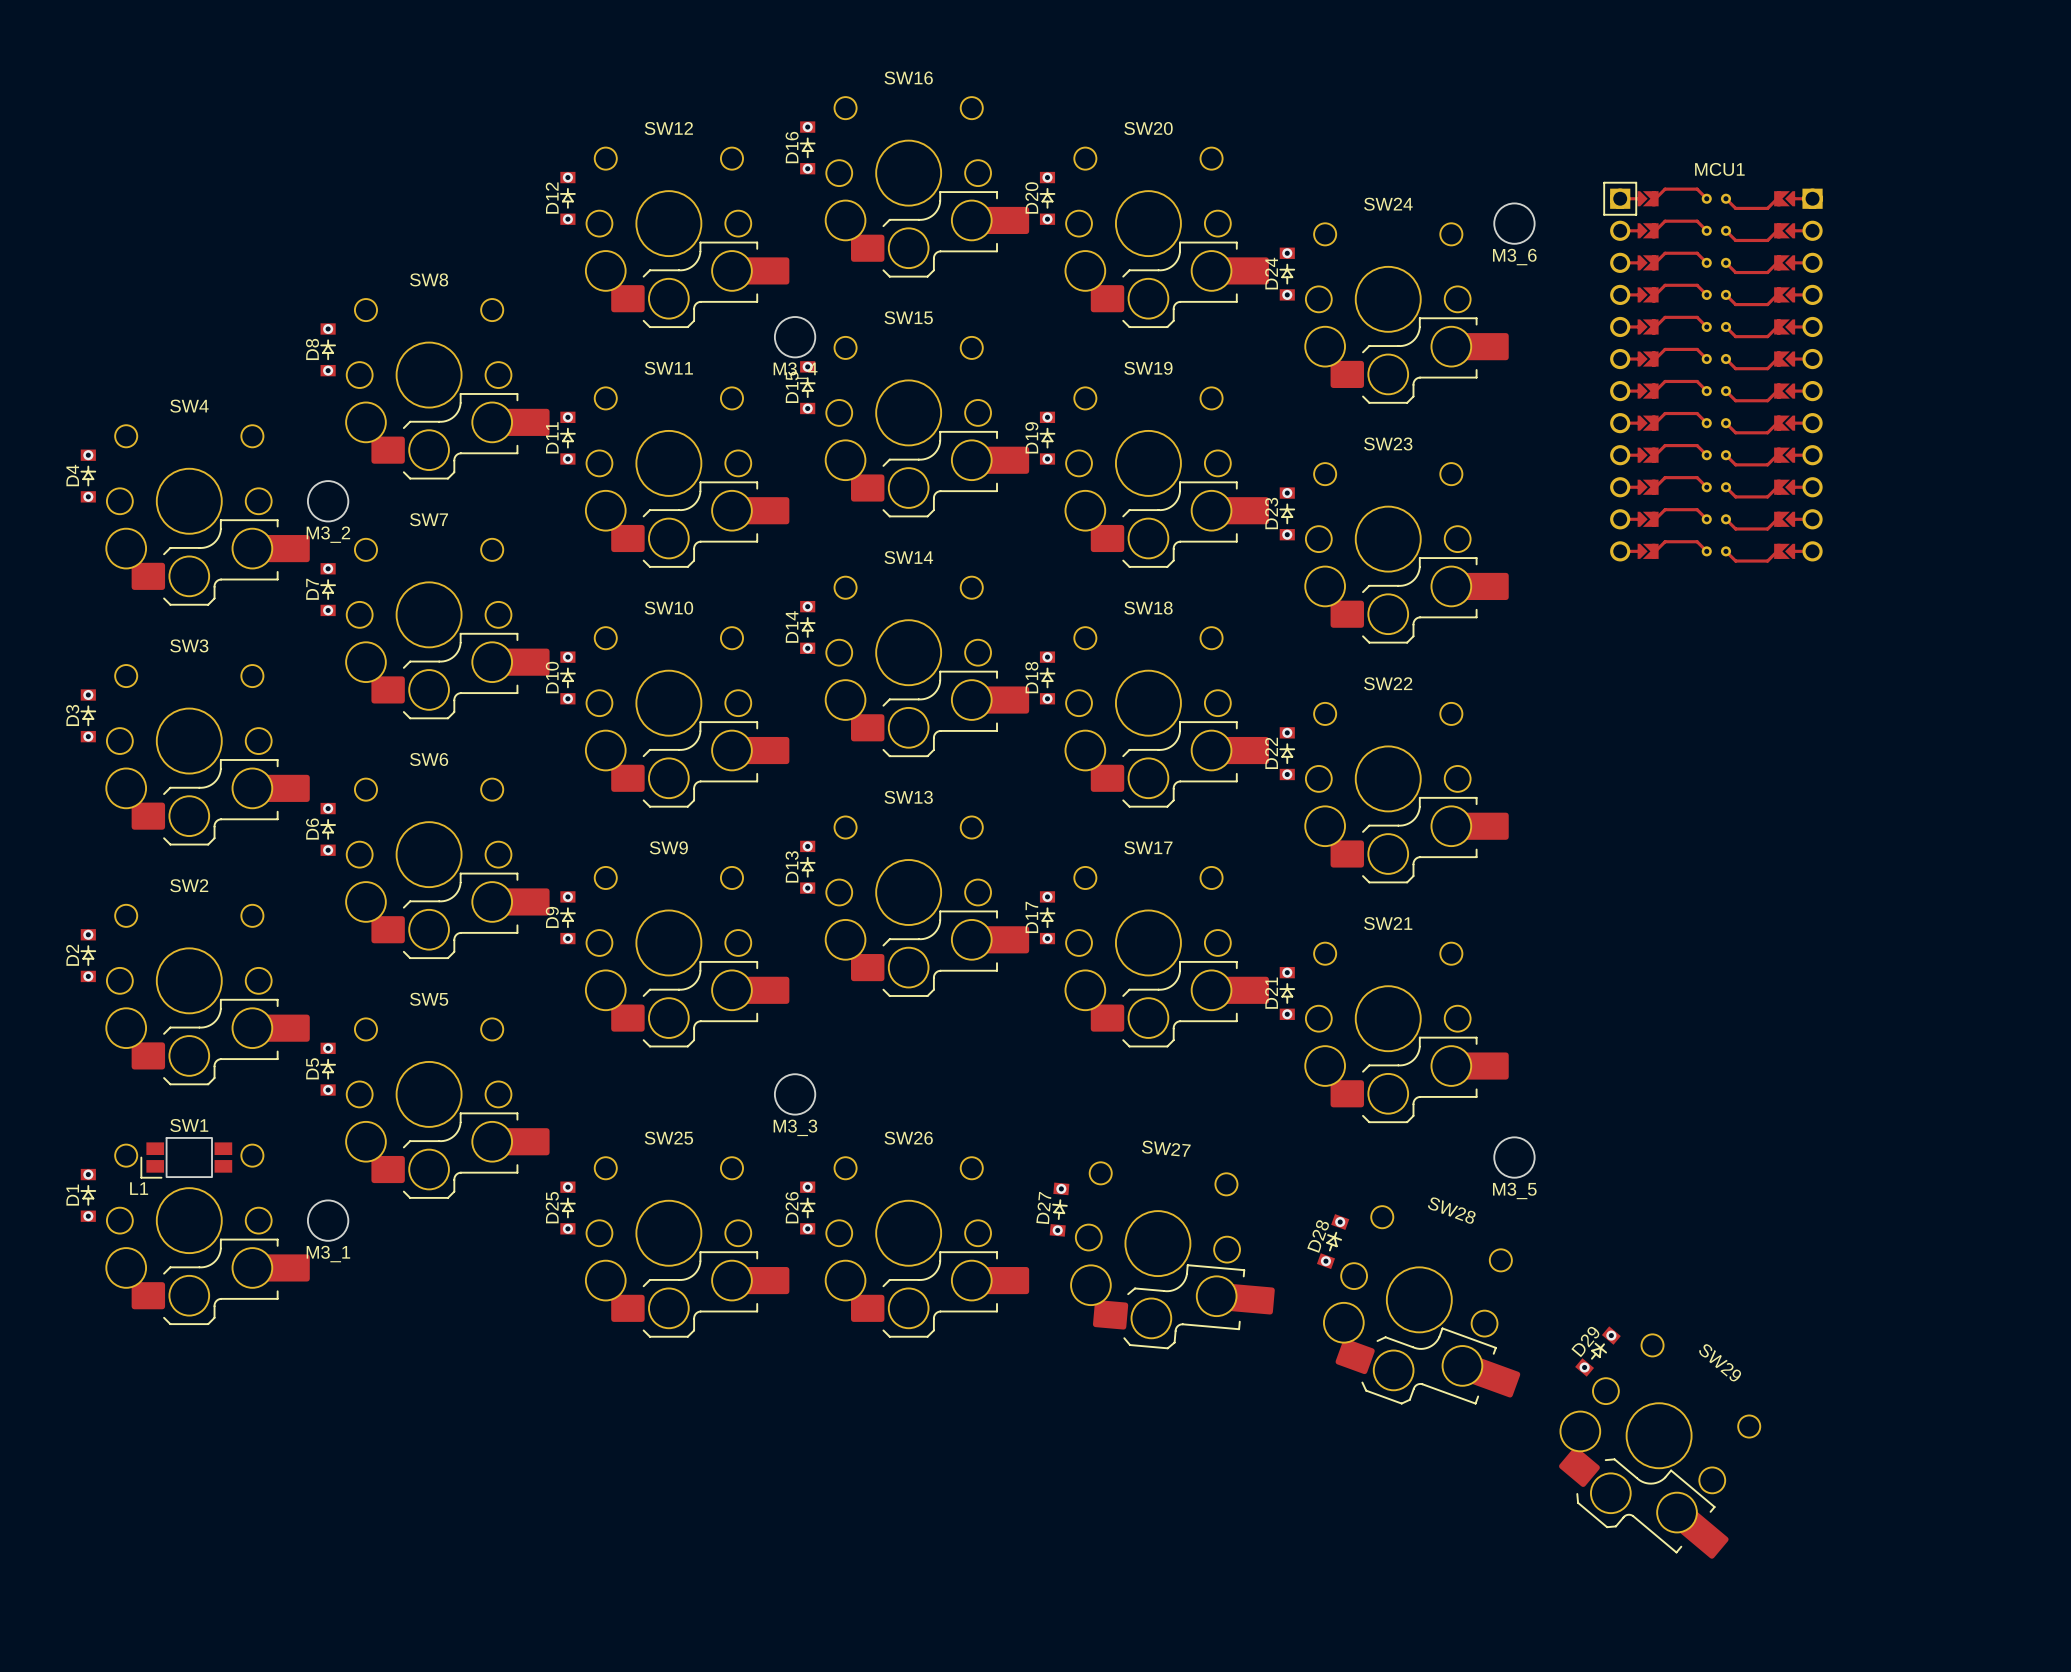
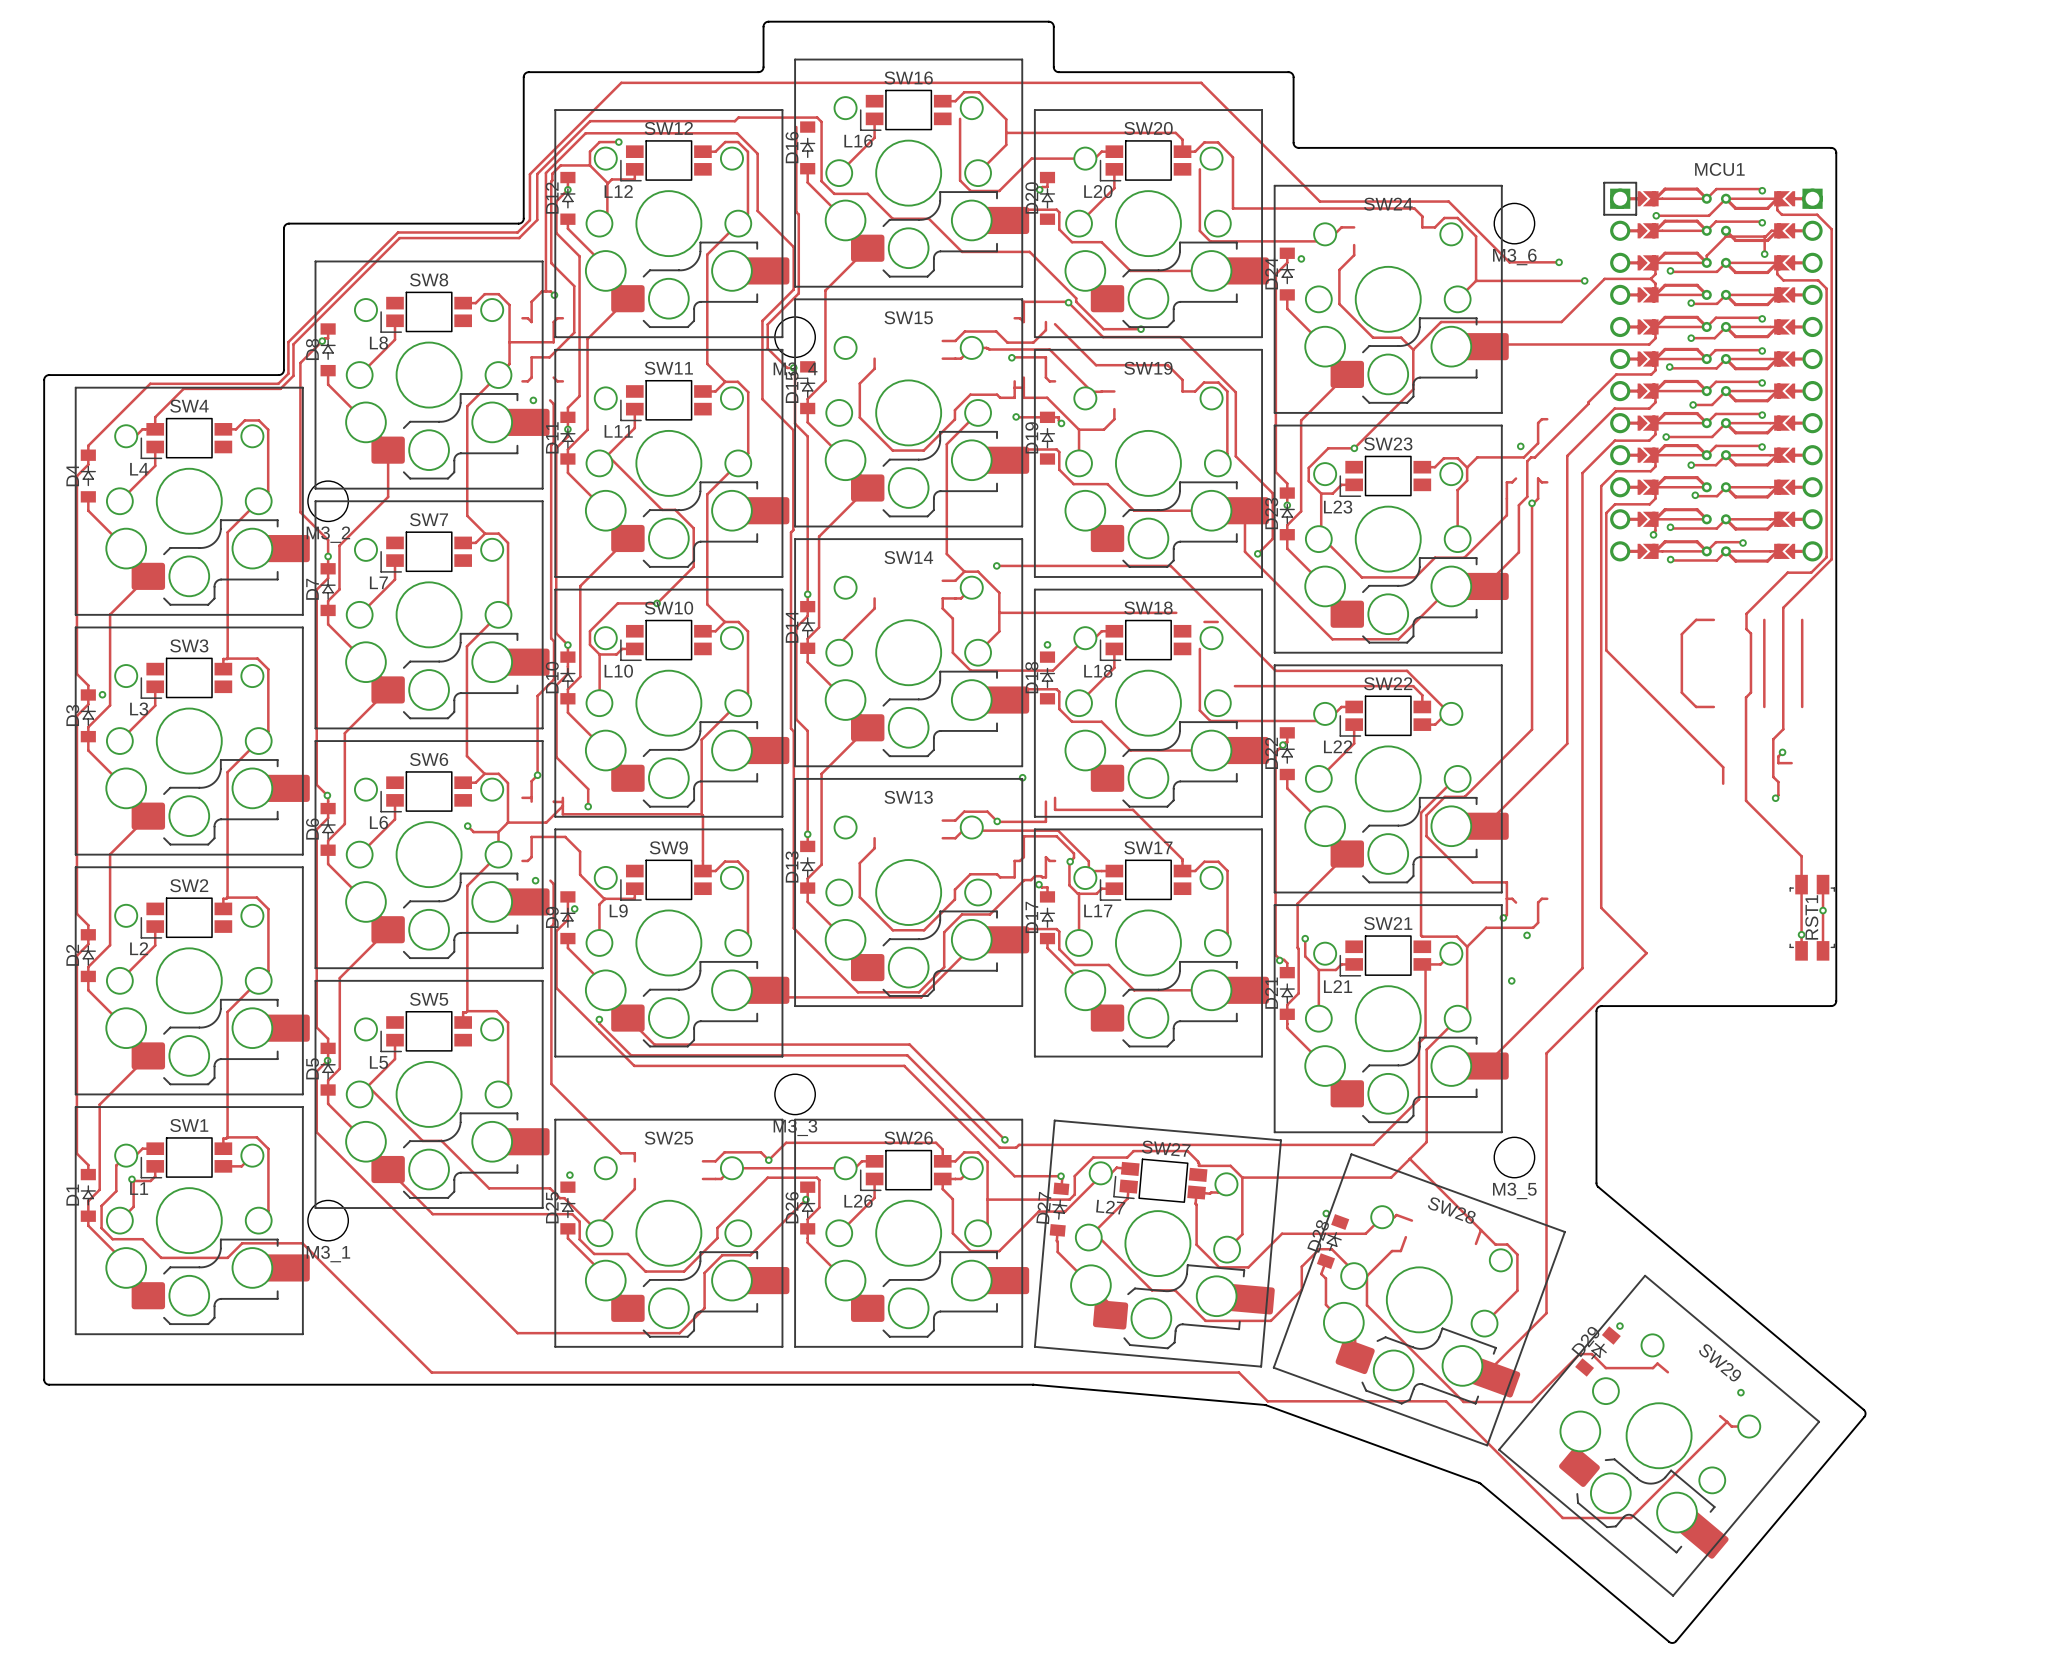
board edge: none -> (768, 21) (1049, 21) (1053, 26) (1053, 67) (1057, 72) (1289, 72) (1293, 77) (1293, 143) (1298, 147) (1831, 147) (1835, 150) (1836, 1002) (1831, 1006) (1598, 1007) (1596, 1011) (1596, 1183) (1598, 1187) (1863, 1409) (1865, 1414) (1674, 1642) (1669, 1641) (1479, 1483) (1265, 1405) (1032, 1384) (49, 1384) (44, 1382) (44, 377) (49, 375) (281, 374) (283, 370) (283, 228) (285, 224) (520, 223) (523, 218) (523, 77) (525, 73) (759, 72) (763, 67) (763, 25) (768, 21)
line: none -> (795, 59) (795, 286) (1022, 286) (1022, 59) (795, 59)
track: none -> (942, 101) (955, 101) (964, 92) (979, 92) (1006, 119) (1006, 144) (978, 173)
line: none -> (555, 110) (782, 110) (782, 337) (555, 337) (555, 110)
part: none -> L16 (905, 110)
line: none -> (1034, 110) (1034, 337) (1262, 337) (1262, 110) (1034, 110)
track: none -> (874, 118) (874, 137) (839, 173)
track: none -> (960, 118) (960, 180) (970, 191) (999, 191) (1031, 158) (1094, 158) (1101, 151) (1114, 151)
track: none -> (796, 127) (798, 293) (767, 324) (767, 348) (787, 367) (795, 367) (795, 423) (807, 436) (807, 616) (796, 627) (796, 719) (807, 730) (807, 846)
via: (807, 127) -> none
track: none -> (1006, 132) (1175, 132) (1182, 139) (1182, 151) (1195, 151) (1204, 142) (1218, 142) (1232, 157) (1232, 208) (1414, 208) (1422, 216) (1422, 227) (1434, 227) (1444, 217) (1457, 217) (1476, 236) (1476, 280)
track: none -> (618, 142) (599, 142) (589, 151) (589, 165)
via: none -> (618, 142)
track: none -> (702, 151) (715, 151) (725, 142) (738, 142) (747, 151) (747, 213) (707, 254) (707, 363) (725, 381)
part: none -> L12 (665, 160)
part: none -> L20 (1145, 160)
track: none -> (589, 165) (560, 165) (552, 173) (551, 181) (551, 263) (574, 286) (574, 332) (549, 357) (531, 357) (531, 377) (527, 381) (522, 381)
track: none -> (589, 165) (607, 183)
track: none -> (807, 168) (807, 182) (845, 220) (845, 226) (867, 248) (825, 290) (825, 381) (807, 399) (807, 422) (867, 482) (867, 488) (819, 536) (819, 627) (807, 638) (807, 662) (867, 722) (867, 727) (821, 773) (821, 864) (807, 878) (807, 901) (867, 961) (867, 967)
via: (807, 168) -> none
track: none -> (634, 169) (634, 179) (611, 179) (607, 183) (607, 215) (599, 223)
track: none -> (1114, 169) (1114, 188) (1079, 223)
track: none -> (1199, 169) (1199, 230) (1210, 241) (1318, 241) (1325, 234) (1334, 234) (1341, 227) (1354, 227)
track: none -> (567, 177) (567, 189) (556, 201) (556, 233) (579, 256) (579, 396) (567, 407) (567, 436) (556, 448) (556, 633) (567, 645) (567, 673) (556, 685) (556, 757) (588, 789) (588, 806)
via: (567, 177) -> none
track: none -> (1047, 177) (1047, 187) (1042, 187) (1039, 189)
via: (1047, 177) -> none
line: none -> (1274, 185) (1274, 412) (1501, 412) (1501, 185) (1274, 185)
via: none -> (567, 189)
via: none -> (1039, 189)
track: none -> (1762, 190) (1760, 189) (1716, 189) (1706, 198) (1655, 198)
via: none -> (1762, 190)
track: none -> (1656, 215) (1708, 215) (1725, 198) (1777, 198) (1777, 210) (1781, 214) (1817, 214) (1831, 229) (1831, 559) (1783, 607) (1783, 729) (1773, 739) (1773, 776) (1778, 782) (1778, 795) (1775, 798)
via: none -> (1656, 215)
track: none -> (567, 219) (567, 228) (605, 266) (605, 270) (627, 293) (627, 298) (587, 339) (587, 429) (567, 449) (567, 472) (627, 532) (627, 538) (580, 586) (580, 676) (567, 689) (567, 712) (627, 772) (627, 778)
via: (567, 219) -> none
via: (1047, 219) -> none
track: none -> (971, 220) (1005, 220) (1015, 209) (1056, 209) (1059, 212) (1059, 229) (1072, 242) (1101, 242) (1130, 270) (1244, 270)
track: none -> (1762, 222) (1715, 221) (1706, 230) (1655, 230)
via: none -> (1762, 222)
track: none -> (1777, 230) (1771, 230) (1765, 236) (1725, 236)
track: none -> (1725, 236) (1706, 255) (1706, 262) (1655, 262) (1655, 274) (1650, 278)
track: none -> (1764, 236) (1764, 254)
track: none -> (1354, 245) (1354, 255) (1339, 269) (1339, 304) (1373, 337) (1401, 337) (1413, 349)
track: none -> (1287, 253) (1287, 262) (1275, 274) (1275, 472) (1287, 483) (1287, 505)
via: (1287, 253) -> none
via: none -> (1764, 254)
via: none -> (1301, 258)
line: none -> (315, 261) (315, 488) (542, 488) (542, 261) (315, 261)
track: none -> (1559, 262) (1509, 262) (1448, 201) (1319, 201) (1201, 82) (621, 82) (529, 174) (529, 220) (517, 232) (398, 232) (288, 342) (288, 373) (278, 383) (150, 383) (88, 445) (88, 464) (76, 476) (76, 674) (88, 685) (88, 704) (76, 715) (76, 913) (88, 925) (88, 944) (76, 955) (76, 1153) (88, 1165) (88, 1174)
via: none -> (1559, 262)
track: none -> (1670, 270) (1717, 271) (1725, 262) (1777, 262) (1777, 274) (1783, 280) (1818, 280) (1826, 288) (1826, 557) (1811, 572) (1787, 572) (1746, 613) (1746, 629) (1750, 633) (1750, 692) (1746, 697) (1746, 800) (1801, 856) (1801, 950)
via: none -> (1670, 270)
track: none -> (1650, 278) (1604, 278) (1561, 322) (1441, 322) (1413, 349)
track: none -> (1650, 278) (1655, 283) (1655, 294) (1706, 294)
track: none -> (1476, 280) (1584, 280)
track: none -> (1476, 280) (1457, 299)
via: none -> (1584, 280)
track: none -> (545, 291) (545, 173) (585, 133) (737, 133) (757, 153) (757, 210) (793, 247) (793, 289) (762, 320) (762, 399) (793, 430) (793, 530) (791, 532) (791, 728) (793, 731) (793, 928) (857, 992) (919, 992) (944, 967) (944, 932) (962, 914) (989, 914) (1024, 880) (1031, 880) (1034, 876) (1045, 877) (1045, 857) (1049, 860) (1055, 860)
track: none -> (1287, 294) (1287, 308) (1347, 368) (1347, 374) (1301, 420) (1301, 511) (1287, 525) (1287, 548) (1347, 608) (1347, 614)
via: (1287, 294) -> none
track: none -> (1777, 294) (1725, 294) (1717, 303) (1691, 303)
track: none -> (554, 295) (550, 291) (541, 291) (531, 301) (531, 322) (527, 318) (522, 318)
via: none -> (554, 295)
line: none -> (795, 299) (795, 526) (1022, 526) (1022, 299) (795, 299)
via: none -> (1068, 302)
track: none -> (463, 303) (475, 303) (484, 294) (498, 294) (509, 305) (509, 364) (467, 406) (467, 515) (485, 533)
via: none -> (1691, 303)
part: none -> L8 (426, 312)
track: none -> (562, 318) (557, 318) (553, 322) (553, 342) (509, 342)
track: none -> (1014, 318) (1020, 318) (1023, 322) (1023, 301) (1067, 301) (1103, 337) (1180, 337) (1235, 392) (1235, 456) (1272, 493) (1272, 538) (1257, 553)
track: none -> (1762, 318) (1715, 317) (1706, 326) (1655, 326) (1655, 338) (1649, 344) (1486, 344) (1484, 346) (1451, 346)
via: none -> (1762, 318)
track: none -> (395, 320) (395, 339) (359, 375)
track: none -> (1045, 322) (1045, 330) (1033, 342) (1007, 342) (996, 331) (964, 331) (955, 340) (942, 340)
track: none -> (1055, 324) (1096, 365) (1167, 365) (1182, 379) (1182, 391) (1195, 391) (1204, 382) (1218, 382) (1227, 391) (1227, 453) (1217, 463)
track: none -> (1777, 326) (1725, 326) (1714, 338) (1691, 338)
track: none -> (328, 328) (328, 338) (324, 338) (300, 362) (300, 512) (328, 540) (328, 578) (316, 589) (316, 784) (328, 796) (328, 818) (316, 829) (316, 1027) (328, 1038) (328, 1060) (316, 1071) (316, 1132) (517, 1333) (679, 1333) (704, 1308) (704, 1272) (722, 1255) (750, 1255) (807, 1197) (807, 1187)
via: (328, 328) -> none
track: none -> (1141, 329) (1103, 329) (1029, 251) (962, 251) (928, 218) (892, 218) (867, 193) (834, 193) (821, 181) (821, 121) (817, 117) (738, 117) (734, 121) (590, 121) (537, 174) (537, 220) (519, 238) (399, 238) (293, 344) (293, 375) (280, 388) (183, 388) (155, 417) (155, 429) (142, 429) (135, 436) (126, 436)
via: none -> (1141, 329)
via: none -> (1691, 338)
via: none -> (322, 341)
line: none -> (555, 349) (782, 349) (782, 576) (555, 576) (555, 349)
line: none -> (1034, 349) (1034, 576) (1262, 576) (1262, 349) (1034, 349)
track: none -> (1413, 349) (1413, 389) (1354, 448) (1328, 448) (1308, 467) (1308, 481) (1321, 493)
track: none -> (1762, 350) (1715, 350) (1706, 359) (1655, 359) (1655, 370) (1651, 374) (1616, 374) (1534, 457) (1531, 457) (1527, 461) (1527, 496) (1518, 505) (1518, 552) (1484, 586) (1451, 586) (1398, 639) (1332, 639) (1244, 551) (1244, 510) (1134, 510) (1107, 484) (1073, 484) (1059, 469) (1059, 452) (1056, 449) (1015, 449) (1005, 460) (971, 460)
via: none -> (1762, 350)
track: none -> (1011, 357) (1045, 357) (1045, 377) (1049, 381) (1055, 381)
via: none -> (1011, 357)
track: none -> (874, 358) (874, 368) (859, 383) (859, 417) (892, 450) (923, 450) (954, 419) (954, 410) (970, 394) (997, 394) (1000, 397) (1014, 397) (1014, 381)
track: none -> (942, 358) (961, 358) (971, 347) (1049, 349) (1091, 391)
track: none -> (1777, 359) (1725, 359) (1716, 368) (1669, 367)
via: (807, 366) -> none
via: none -> (793, 367)
via: none -> (1669, 367)
track: none -> (328, 370) (328, 384) (388, 444) (388, 497) (339, 545) (339, 589) (328, 600) (328, 624) (388, 684) (388, 689) (344, 733) (344, 824) (328, 840) (328, 864) (388, 924) (388, 929) (339, 978) (339, 1068) (328, 1080) (328, 1103) (388, 1163) (388, 1169) (432, 1214) (572, 1214) (579, 1221) (579, 1239) (594, 1253) (627, 1253) (645, 1271) (684, 1271) (717, 1238) (717, 1227) (767, 1177) (816, 1177) (819, 1180) (819, 1207) (807, 1219) (807, 1242) (867, 1302) (867, 1308)
via: (328, 370) -> none
track: none -> (553, 377) (557, 381) (562, 381)
track: none -> (1023, 377) (1023, 397) (1047, 397) (1079, 429)
track: none -> (725, 381) (737, 381) (748, 392) (748, 453) (707, 494) (707, 604) (724, 621)
track: none -> (725, 381) (715, 391) (702, 391)
track: none -> (1762, 382) (1715, 381) (1706, 391) (1655, 391) (1655, 402) (1649, 408) (1614, 408) (1567, 455) (1567, 743) (1484, 826) (1451, 826)
via: none -> (1762, 382)
line: none -> (75, 387) (75, 614) (302, 614) (302, 387) (75, 387)
track: none -> (1014, 387) (1023, 387)
track: none -> (1114, 391) (1091, 391)
track: none -> (1777, 391) (1725, 391) (1712, 404) (1693, 404)
via: none -> (533, 400)
track: none -> (550, 400) (553, 403) (553, 442) (551, 445) (551, 638) (554, 641) (554, 679) (537, 695) (537, 775) (531, 781) (531, 801)
part: none -> L11 (665, 400)
via: none -> (1693, 404)
via: (807, 408) -> none
track: none -> (634, 409) (634, 428) (599, 463)
track: none -> (1114, 409) (1114, 419) (1103, 429) (1079, 429)
track: none -> (978, 412) (946, 444) (946, 554) (964, 571)
track: none -> (1762, 415) (1715, 413) (1706, 423) (1655, 423) (1655, 434) (1649, 440) (1614, 440) (1582, 473) (1582, 968) (1484, 1066) (1451, 1066)
via: none -> (1762, 415)
track: none -> (1016, 416) (1058, 417) (1061, 423)
via: none -> (1016, 416)
via: (567, 417) -> none
via: (1047, 417) -> none
track: none -> (1547, 419) (1541, 419) (1538, 423) (1538, 443) (1523, 457) (1477, 457) (1467, 467)
via: none -> (1061, 423)
track: none -> (1777, 423) (1725, 423) (1712, 437) (1666, 437)
line: none -> (1274, 425) (1274, 652) (1501, 652) (1501, 425) (1274, 425)
track: none -> (223, 429) (236, 429) (244, 420) (258, 420) (268, 429) (268, 491) (227, 532) (227, 658)
via: none -> (567, 429)
track: none -> (1079, 429) (1079, 463)
via: none -> (1666, 437)
part: none -> L4 (186, 438)
track: none -> (155, 446) (155, 465) (119, 501)
via: none -> (1520, 446)
track: none -> (1762, 447) (1716, 445) (1706, 455) (1655, 455) (1655, 466) (1650, 471) (1616, 471) (1601, 486) (1601, 907) (1646, 953) (1546, 1053) (1546, 1313) (1493, 1365)
via: none -> (1762, 447)
via: none -> (1354, 448)
via: (88, 455) -> none
track: none -> (607, 455) (662, 509) (675, 509) (693, 528) (693, 566) (657, 603) (617, 603) (589, 631) (589, 644) (599, 654)
track: none -> (1777, 455) (1725, 455) (1716, 465) (1691, 465)
via: (567, 458) -> none
via: (1047, 458) -> none
via: none -> (1691, 465)
track: none -> (1422, 467) (1434, 467) (1443, 458) (1457, 458) (1467, 467)
track: none -> (1467, 467) (1467, 480) (1457, 490) (1457, 539)
part: none -> L23 (1385, 476)
track: none -> (1516, 478) (1512, 482) (1506, 482) (1506, 515) (1464, 557) (1435, 557) (1415, 577) (1361, 577) (1321, 536)
track: none -> (1547, 482) (1541, 482) (1538, 478) (1538, 498) (1532, 503) (1532, 729) (1464, 796) (1444, 796) (1426, 815) (1426, 836) (1472, 882) (1506, 882) (1506, 915) (1503, 917)
track: none -> (1354, 484) (1341, 484) (1332, 493) (1321, 493)
track: none -> (1706, 487) (1655, 487) (1655, 498) (1649, 504) (1615, 504) (1606, 513) (1606, 650) (1723, 767) (1723, 783)
track: none -> (1777, 487) (1725, 487) (1717, 496) (1695, 495)
via: (1287, 493) -> none
track: none -> (1321, 493) (1321, 536)
via: none -> (1695, 495)
track: none -> (88, 496) (88, 510) (148, 570) (148, 576) (110, 614) (110, 705) (88, 727) (88, 750) (148, 810) (148, 816) (110, 854) (110, 945) (88, 966) (88, 990) (148, 1050) (148, 1055) (99, 1104) (99, 1189) (88, 1201) (88, 1225) (126, 1263) (126, 1267) (148, 1290) (148, 1295)
via: (88, 496) -> none
line: none -> (315, 501) (315, 728) (542, 728) (542, 501) (315, 501)
via: none -> (1532, 503)
via: none -> (1287, 505)
track: none -> (1706, 519) (1655, 519) (1653, 534)
track: none -> (1777, 519) (1725, 519) (1716, 528) (1670, 527)
via: none -> (1670, 527)
track: none -> (485, 533) (498, 533) (508, 542) (508, 605) (466, 646) (466, 756) (484, 773)
track: none -> (485, 533) (475, 542) (463, 542)
via: (1287, 534) -> none
via: none -> (1653, 534)
line: none -> (795, 539) (1022, 539) (1022, 766) (795, 766) (795, 539)
track: none -> (1743, 542) (1715, 542) (1706, 551) (1655, 551)
via: none -> (1743, 542)
track: none -> (1777, 551) (1725, 551) (1716, 560) (1670, 559)
part: none -> L7 (426, 552)
via: none -> (1257, 553)
via: none -> (328, 556)
via: none -> (1670, 559)
track: none -> (395, 560) (395, 579) (359, 614)
track: none -> (996, 565) (1170, 565) (1275, 670) (1407, 670) (1445, 709) (1445, 713)
via: none -> (996, 565)
via: (328, 568) -> none
track: none -> (964, 571) (955, 580) (942, 580)
track: none -> (964, 571) (978, 571) (999, 592) (999, 631) (978, 652)
track: none -> (971, 587) (961, 598) (942, 598) (942, 608) (952, 618) (952, 652) (970, 670) (1052, 670) (1085, 638) (1094, 638) (1101, 631) (1114, 631)
line: none -> (555, 589) (782, 589) (782, 816) (555, 816) (555, 589)
line: none -> (1034, 589) (1034, 816) (1262, 816) (1262, 589) (1034, 589)
via: none -> (807, 594)
track: none -> (874, 598) (874, 608) (839, 643) (839, 652)
via: none -> (657, 603)
via: (807, 606) -> none
via: (328, 610) -> none
track: none -> (999, 612) (1176, 612)
track: none -> (1713, 619) (1696, 619) (1681, 634) (1681, 692) (1696, 706) (1713, 706)
track: none -> (1764, 619) (1764, 706)
track: none -> (1802, 619) (1802, 706)
track: none -> (724, 621) (738, 621) (748, 631) (748, 693) (701, 739) (701, 814)
track: none -> (724, 621) (715, 631) (702, 631)
track: none -> (1204, 621) (1217, 621)
line: none -> (75, 627) (75, 854) (302, 854) (302, 627) (75, 627)
part: none -> L10 (665, 640)
part: none -> L18 (1145, 640)
via: none -> (1047, 644)
via: none -> (567, 645)
track: none -> (634, 648) (622, 648) (616, 654) (599, 654)
via: (807, 648) -> none
track: none -> (1114, 648) (1114, 667) (1079, 703)
track: none -> (1199, 648) (1199, 710) (1210, 720) (1318, 720) (1325, 713) (1334, 713) (1341, 706) (1354, 706)
track: none -> (599, 654) (599, 703)
via: (567, 657) -> none
via: (1047, 657) -> none
track: none -> (227, 658) (257, 658) (268, 669) (268, 731) (227, 772) (227, 897)
track: none -> (227, 658) (223, 658) (223, 669)
line: none -> (1274, 665) (1274, 892) (1501, 892) (1501, 665) (1274, 665)
part: none -> L3 (186, 678)
track: none -> (155, 686) (155, 705) (119, 741)
track: none -> (1234, 686) (1413, 686) (1422, 695) (1422, 706)
via: (88, 694) -> none
via: none -> (102, 694)
via: (567, 698) -> none
via: (1047, 698) -> none
track: none -> (971, 700) (1005, 700) (1015, 689) (1056, 689) (1059, 691) (1059, 709) (1072, 721) (1101, 721) (1130, 750) (1244, 750)
track: none -> (1445, 713) (1435, 724) (1422, 724)
part: none -> L22 (1385, 716)
track: none -> (1354, 724) (1354, 743) (1318, 778)
track: none -> (1287, 732) (1287, 742) (1275, 752) (1275, 955) (1280, 959)
via: (1287, 732) -> none
via: (88, 736) -> none
line: none -> (315, 741) (542, 741) (542, 968) (315, 968) (315, 741)
via: none -> (1282, 745)
track: none -> (1782, 752) (1778, 756) (1778, 763) (1791, 763)
via: none -> (1782, 752)
track: none -> (484, 773) (475, 782) (463, 782)
track: none -> (484, 773) (498, 773) (507, 783) (507, 822)
track: none -> (1287, 774) (1287, 788) (1347, 848) (1347, 854) (1297, 903) (1298, 993) (1287, 1004) (1287, 1028) (1347, 1088) (1347, 1093)
via: (1287, 774) -> none
via: none -> (537, 775)
via: none -> (1022, 777)
line: none -> (795, 778) (795, 1006) (1022, 1006) (1022, 778) (795, 778)
track: none -> (1457, 778) (1454, 778) (1421, 812) (1421, 935) (1457, 936) (1467, 946)
part: none -> L6 (426, 791)
via: none -> (327, 795)
track: none -> (522, 797) (531, 797)
track: none -> (562, 797) (562, 814) (701, 814)
track: none -> (1055, 797) (1055, 809) (1133, 809) (1182, 859) (1182, 871) (1195, 871) (1204, 861) (1218, 861) (1227, 870) (1227, 933) (1217, 942)
via: none -> (1775, 798)
track: none -> (395, 800) (395, 819) (359, 854)
track: none -> (553, 801) (562, 801)
track: none -> (1045, 801) (1045, 821) (997, 821) (987, 811) (964, 811) (955, 820) (942, 820)
track: none -> (562, 806) (546, 822) (507, 822)
via: none -> (588, 806)
via: (328, 808) -> none
track: none -> (701, 814) (702, 871) (715, 871) (725, 861) (738, 861) (747, 871) (747, 933) (738, 942)
via: none -> (997, 821)
track: none -> (507, 822) (498, 832)
track: none -> (467, 826) (473, 832) (498, 832)
via: none -> (467, 826)
line: none -> (555, 829) (782, 829) (782, 1056) (555, 1056) (555, 829)
line: none -> (1034, 829) (1034, 1056) (1262, 1056) (1262, 829) (1034, 829)
track: none -> (498, 832) (498, 854) (467, 885) (467, 1011)
via: none -> (807, 834)
track: none -> (874, 838) (874, 848) (859, 863) (859, 897) (892, 930) (924, 930) (954, 899) (954, 889) (970, 874) (997, 874) (1000, 877) (1014, 877) (1014, 860) (1020, 860) (1023, 857) (1024, 836) (1056, 836) (1073, 853) (1073, 857) (1069, 862) (1069, 885) (1077, 893) (1096, 893) (1101, 888) (1114, 888)
track: none -> (942, 838) (955, 838) (962, 830) (1058, 830) (1088, 861) (1088, 874) (1085, 877)
via: (807, 846) -> none
via: (328, 850) -> none
track: none -> (522, 860) (527, 860) (531, 857) (531, 836) (565, 836) (580, 851) (580, 874) (604, 899)
via: none -> (1070, 861)
line: none -> (75, 867) (75, 1094) (302, 1094) (302, 867) (75, 867)
track: none -> (1088, 871) (1114, 871)
via: none -> (535, 880)
track: none -> (550, 880) (553, 883) (553, 924) (551, 926) (551, 1083) (620, 1153) (634, 1153) (634, 1161)
part: none -> L9 (665, 880)
part: none -> L17 (1145, 880)
track: none -> (1038, 884) (1041, 887) (1047, 887) (1047, 896)
via: none -> (1038, 884)
track: none -> (1823, 884) (1823, 950)
track: none -> (634, 888) (634, 898) (605, 898) (599, 904) (599, 942)
via: (807, 888) -> none
track: none -> (1079, 893) (1079, 942)
track: none -> (567, 896) (567, 919) (556, 931) (556, 988) (634, 1065) (904, 1065) (1014, 1176) (1061, 1176) (1061, 1188)
via: (567, 896) -> none
via: (1047, 896) -> none
track: none -> (227, 897) (256, 897) (268, 909) (268, 971) (227, 1011) (227, 1137)
track: none -> (227, 897) (223, 898) (223, 908)
track: none -> (1506, 898) (1512, 898) (1516, 902)
track: none -> (1547, 898) (1541, 898) (1538, 902) (1538, 922) (1533, 927) (1486, 927) (1467, 946)
line: none -> (1274, 905) (1274, 1132) (1501, 1132) (1501, 905) (1274, 905)
via: none -> (574, 908)
via: none -> (1823, 910)
via: none -> (1503, 917)
RST1: none -> (1812, 917)
part: none -> L2 (186, 918)
track: none -> (155, 926) (155, 945) (119, 980)
via: (88, 934) -> none
via: none -> (1801, 934)
via: none -> (1527, 935)
track: none -> (567, 938) (567, 948) (605, 985) (605, 995) (654, 1044) (909, 1044) (1004, 1139)
via: (567, 938) -> none
track: none -> (1047, 938) (1047, 948) (1085, 985) (1085, 990) (1107, 1012) (1107, 1018)
via: (1047, 938) -> none
track: none -> (1305, 938) (1305, 956) (1318, 969)
via: none -> (1305, 938)
track: none -> (1467, 946) (1467, 1009) (1426, 1049) (1426, 1142) (1391, 1177) (1242, 1177)
track: none -> (1451, 953) (1440, 964) (1422, 964)
part: none -> L21 (1385, 955)
track: none -> (1280, 959) (1283, 959) (1287, 963) (1287, 972)
via: none -> (1279, 960)
track: none -> (1354, 964) (1341, 964) (1335, 969) (1318, 969)
track: none -> (1425, 964) (1425, 1036) (1419, 1042) (1419, 1099) (1373, 1144) (1019, 1144) (1016, 1147) (999, 1147) (907, 1055) (631, 1055) (599, 1023) (599, 1019)
track: none -> (1318, 969) (1318, 1018)
via: (1287, 972) -> none
via: (88, 976) -> none
line: none -> (315, 980) (542, 980) (542, 1208) (315, 1208) (315, 980)
via: none -> (1511, 980)
track: none -> (731, 990) (765, 990) (772, 997) (921, 997) (971, 946) (971, 939) (1005, 939) (1015, 929) (1056, 929) (1059, 931) (1059, 949) (1074, 964) (1108, 964) (1134, 990) (1244, 990)
track: none -> (467, 1011) (463, 1012) (463, 1022)
track: none -> (467, 1011) (496, 1011) (508, 1022) (508, 1084) (498, 1094)
via: (1287, 1014) -> none
via: none -> (599, 1019)
part: none -> L5 (426, 1031)
track: none -> (395, 1040) (395, 1059) (359, 1094)
via: (328, 1048) -> none
via: none -> (327, 1060)
track: none -> (367, 1086) (422, 1140) (441, 1140) (489, 1188) (550, 1188) (559, 1198) (564, 1198) (595, 1228)
via: (328, 1090) -> none
line: none -> (75, 1107) (75, 1334) (302, 1334) (302, 1107) (75, 1107)
line: none -> (555, 1119) (555, 1346) (782, 1346) (782, 1119) (555, 1119)
line: none -> (795, 1119) (795, 1346) (1022, 1346) (1022, 1119) (795, 1119)
line: none -> (1054, 1120) (1034, 1346) (1261, 1366) (1280, 1140) (1054, 1120)
track: none -> (227, 1137) (223, 1138) (223, 1148)
track: none -> (227, 1137) (256, 1137) (268, 1148) (268, 1210) (258, 1220)
via: none -> (1004, 1139)
track: none -> (155, 1148) (142, 1148) (135, 1155) (126, 1155) (116, 1165) (116, 1191) (101, 1205) (101, 1228) (112, 1239) (142, 1239) (161, 1257) (227, 1257) (242, 1243) (302, 1243) (431, 1372) (1238, 1372) (1267, 1401) (1446, 1401) (1562, 1518) (1630, 1518) (1727, 1421)
line: none -> (1351, 1154) (1273, 1367) (1487, 1445) (1564, 1231) (1351, 1154)
track: none -> (252, 1155) (241, 1166) (223, 1166)
track: none -> (1409, 1158) (1480, 1230)
via: none -> (768, 1160)
track: none -> (702, 1161) (715, 1161) (724, 1152) (760, 1152) (768, 1160) (786, 1142) (936, 1142) (942, 1149) (942, 1161) (955, 1161) (964, 1152) (978, 1152) (987, 1161) (987, 1223) (978, 1233)
track: none -> (874, 1161) (861, 1161) (855, 1168) (731, 1168) (721, 1178) (702, 1178)
track: none -> (155, 1166) (155, 1176) (150, 1181) (133, 1181)
track: none -> (971, 1168) (961, 1178) (942, 1178) (942, 1189) (952, 1199) (952, 1233) (970, 1251) (999, 1251) (1038, 1211) (1065, 1211) (1100, 1176) (1100, 1173) (1111, 1173) (1116, 1167) (1130, 1168)
part: none -> L26 (905, 1170)
via: (88, 1174) -> none
via: none -> (569, 1175)
via: none -> (1061, 1176)
track: none -> (1242, 1177) (1230, 1165) (1198, 1165) (1198, 1161) (1187, 1151) (1133, 1151) (1127, 1157) (1093, 1157) (1074, 1176) (1074, 1194) (1069, 1199) (987, 1199)
track: none -> (1242, 1177) (1242, 1234) (1227, 1249)
track: none -> (634, 1178) (634, 1189) (595, 1228)
track: none -> (874, 1178) (874, 1197) (839, 1233)
via: none -> (131, 1179)
part: none -> L27 (1160, 1180)
track: none -> (133, 1181) (133, 1206) (119, 1220)
track: none -> (1226, 1184) (1218, 1192) (1196, 1192) (1196, 1244) (1219, 1267) (1248, 1267) (1282, 1233) (1365, 1233) (1382, 1217) (1394, 1217) (1396, 1215) (1411, 1220)
track: none -> (1128, 1186) (1127, 1198) (1088, 1237)
via: (567, 1187) -> none
via: (807, 1187) -> none
via: (1061, 1188) -> none
via: none -> (805, 1199)
via: none -> (1326, 1213)
via: (88, 1216) -> none
via: (1340, 1222) -> none
track: none -> (567, 1228) (567, 1238) (605, 1276) (605, 1280) (627, 1302) (627, 1308)
via: (567, 1228) -> none
via: (807, 1228) -> none
track: none -> (1057, 1230) (1057, 1252) (1110, 1304) (1110, 1314)
via: (1057, 1230) -> none
track: none -> (1480, 1230) (1495, 1244) (1507, 1244) (1517, 1254) (1517, 1290) (1484, 1323)
track: none -> (1480, 1230) (1475, 1243)
track: none -> (1093, 1232) (1152, 1290) (1175, 1290) (1205, 1320) (1270, 1320) (1301, 1289) (1301, 1266) (1319, 1249) (1331, 1249) (1354, 1271) (1354, 1276) (1366, 1276)
track: none -> (1405, 1237) (1400, 1251) (1392, 1251) (1366, 1276)
track: none -> (1325, 1261) (1321, 1273) (1325, 1278) (1325, 1304) (1355, 1334) (1355, 1356)
via: (1325, 1261) -> none
line: none -> (1645, 1275) (1819, 1421) (1673, 1595) (1499, 1449) (1645, 1275)
track: none -> (1366, 1276) (1366, 1305) (1463, 1401) (1531, 1401) (1579, 1354) (1591, 1354) (1605, 1368) (1653, 1368) (1657, 1363) (1667, 1372)
via: none -> (1619, 1326)
via: (1611, 1335) -> none
via: (1584, 1367) -> none
via: none -> (1740, 1392)
track: none -> (1720, 1416) (1727, 1421)
track: none -> (1727, 1421) (1731, 1426) (1749, 1426)

